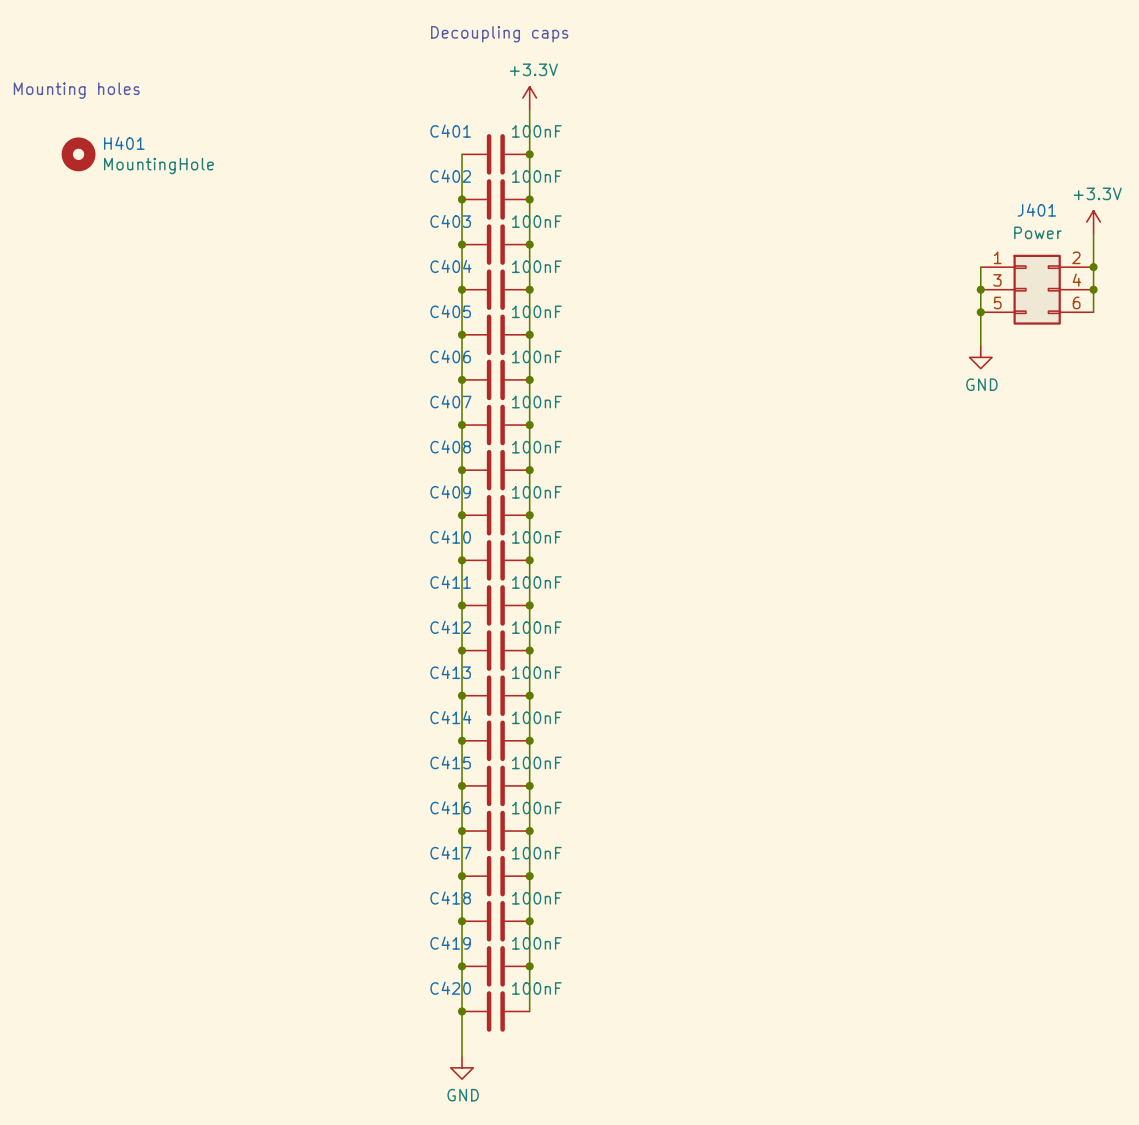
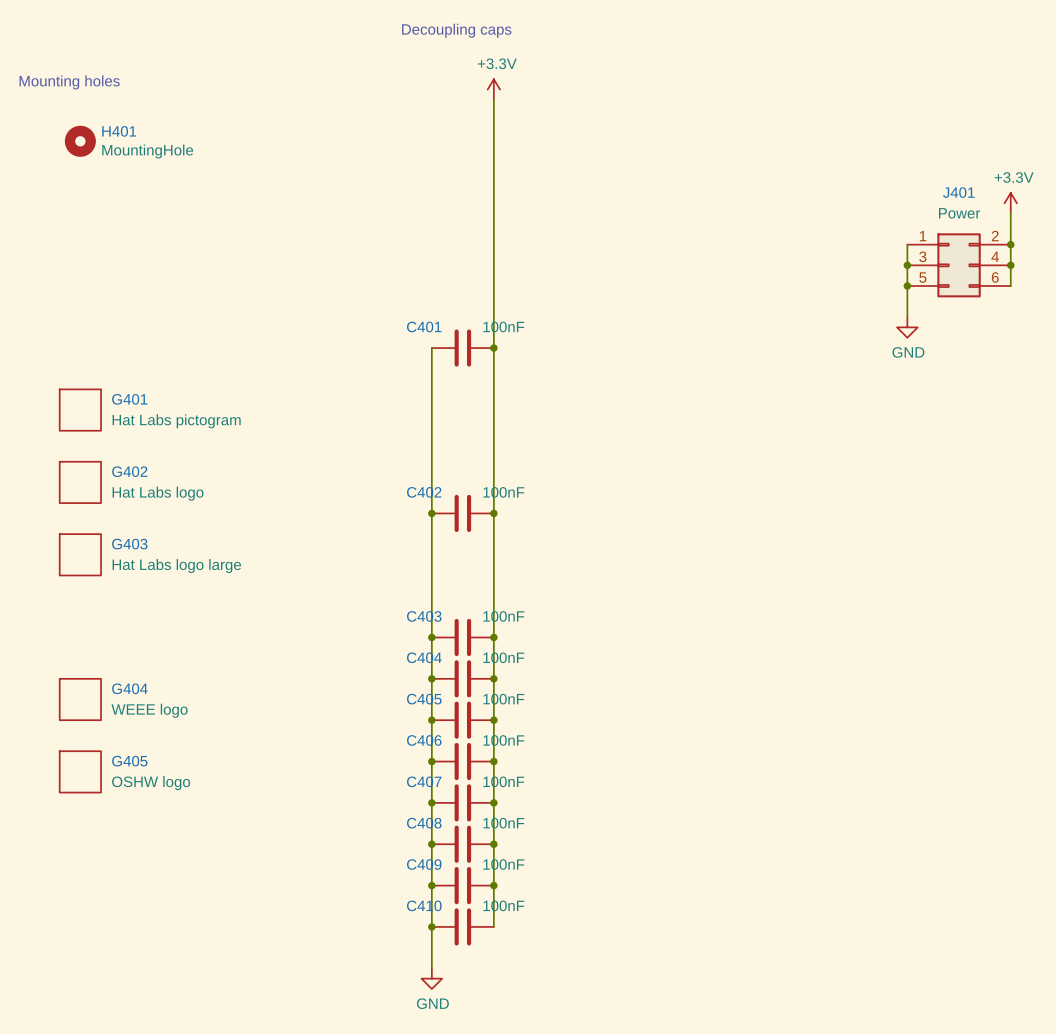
wire: (462, 154) (462, 379) -> none
C401: 100nF (495, 154) -> none
junction: (529, 154) -> none
junction: (462, 199) -> none
C402: 100nF (495, 199) -> none
junction: (529, 199) -> none
junction: (462, 244) -> none
C403: 100nF (495, 244) -> none
junction: (529, 244) -> none
junction: (462, 289) -> none
C404: 100nF (495, 289) -> none
junction: (529, 289) -> none
junction: (462, 334) -> none
C405: 100nF (495, 334) -> none
junction: (529, 334) -> none
C406 name: C406 (450, 356) -> C401 (424, 326)
junction: (462, 379) -> none
junction: (462, 425) -> none
C407: 100nF (495, 425) -> none
junction: (529, 425) -> none
G401: none -> Hat Labs pictogram (80, 410)
junction: (462, 470) -> none
C408: 100nF (495, 470) -> none
junction: (529, 470) -> none
junction: (462, 515) -> none
C409: 100nF (495, 515) -> none
junction: (529, 515) -> none
G402: none -> Hat Labs logo (80, 482)
C410 name: C410 (450, 537) -> C402 (424, 492)
G403: none -> Hat Labs logo large (80, 554)
junction: (462, 605) -> none
C411: 100nF (495, 605) -> none
junction: (529, 605) -> none
junction: (462, 650) -> none
C412: 100nF (495, 650) -> none
junction: (529, 650) -> none
C413 name: C413 (450, 672) -> C403 (424, 616)
C414 name: C414 (450, 717) -> C404 (424, 657)
C415 name: C415 (450, 762) -> C405 (424, 699)
G404: none -> WEEE logo (80, 699)
C416 name: C416 (450, 807) -> C406 (424, 740)
G405: none -> OSHW logo (80, 771)
C417 name: C417 (450, 852) -> C407 (424, 781)
C418 name: C418 (450, 898) -> C408 (424, 823)
C419 name: C419 (450, 943) -> C409 (424, 864)
C420 name: C420 (450, 988) -> C410 (424, 905)

